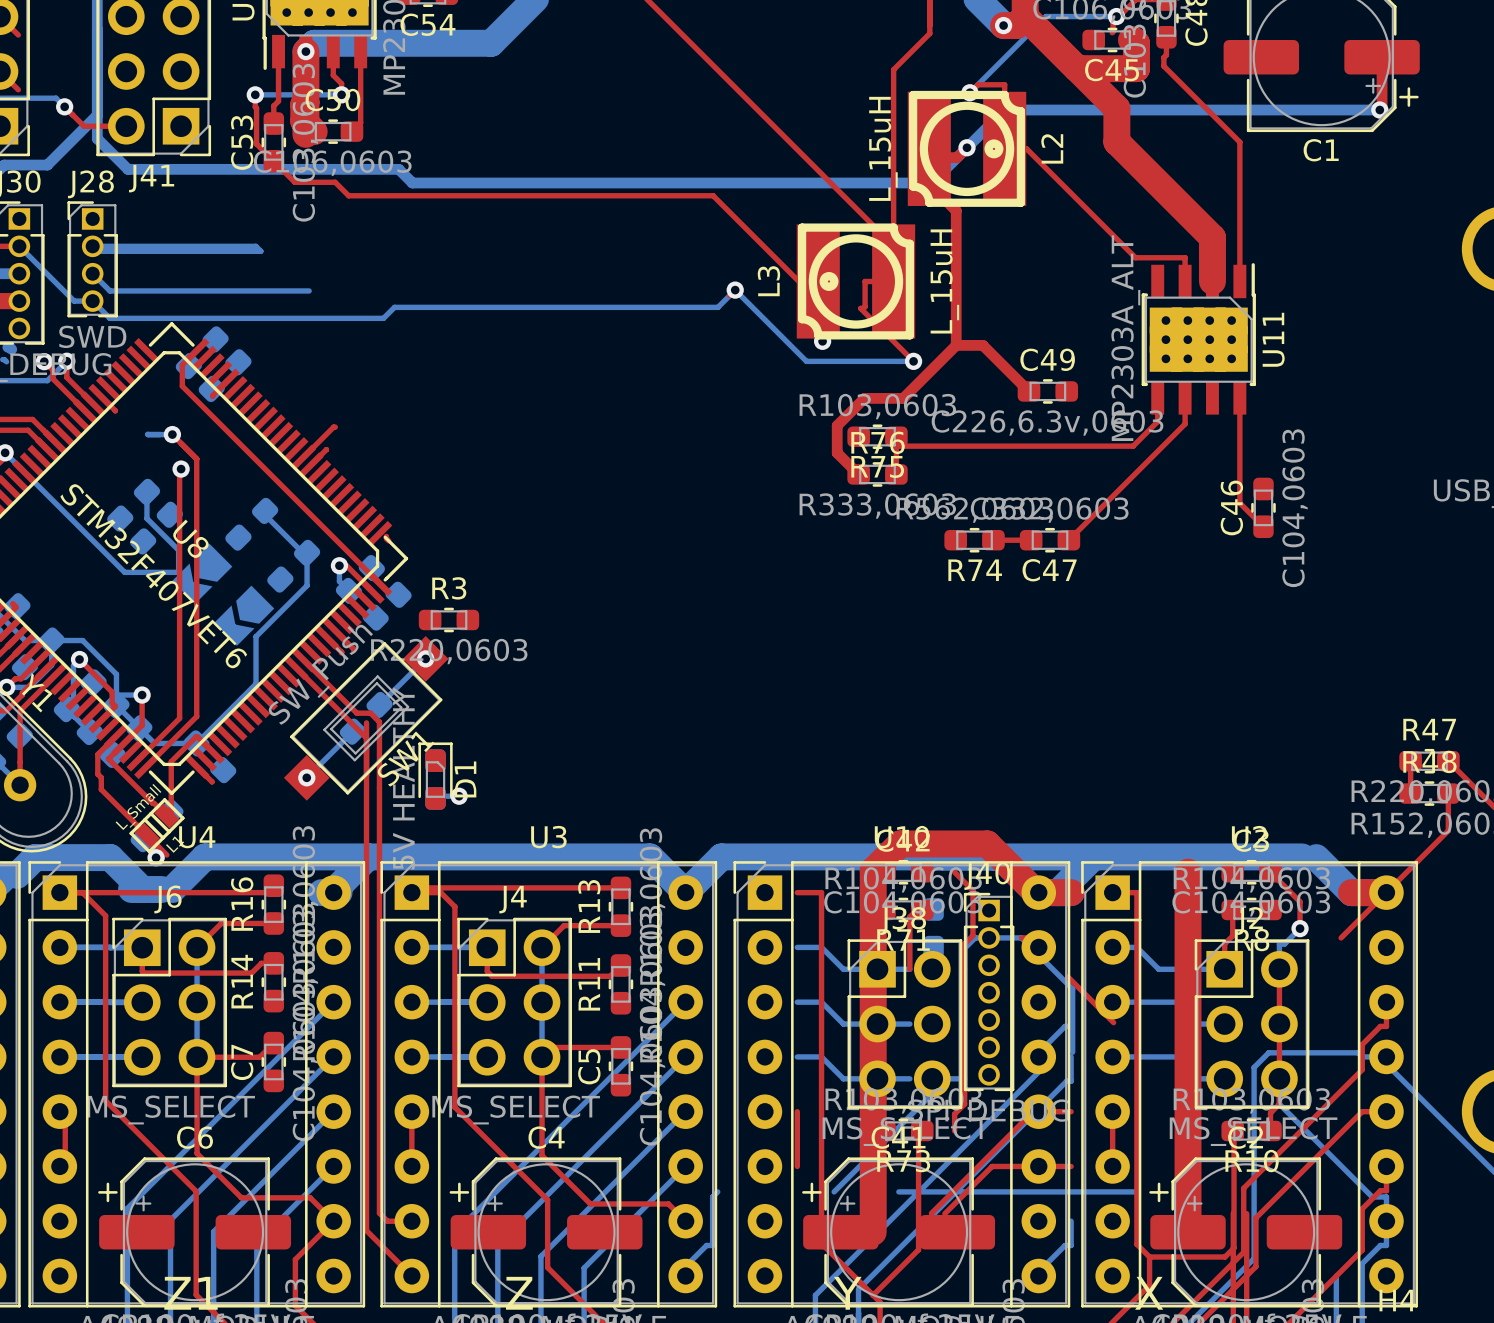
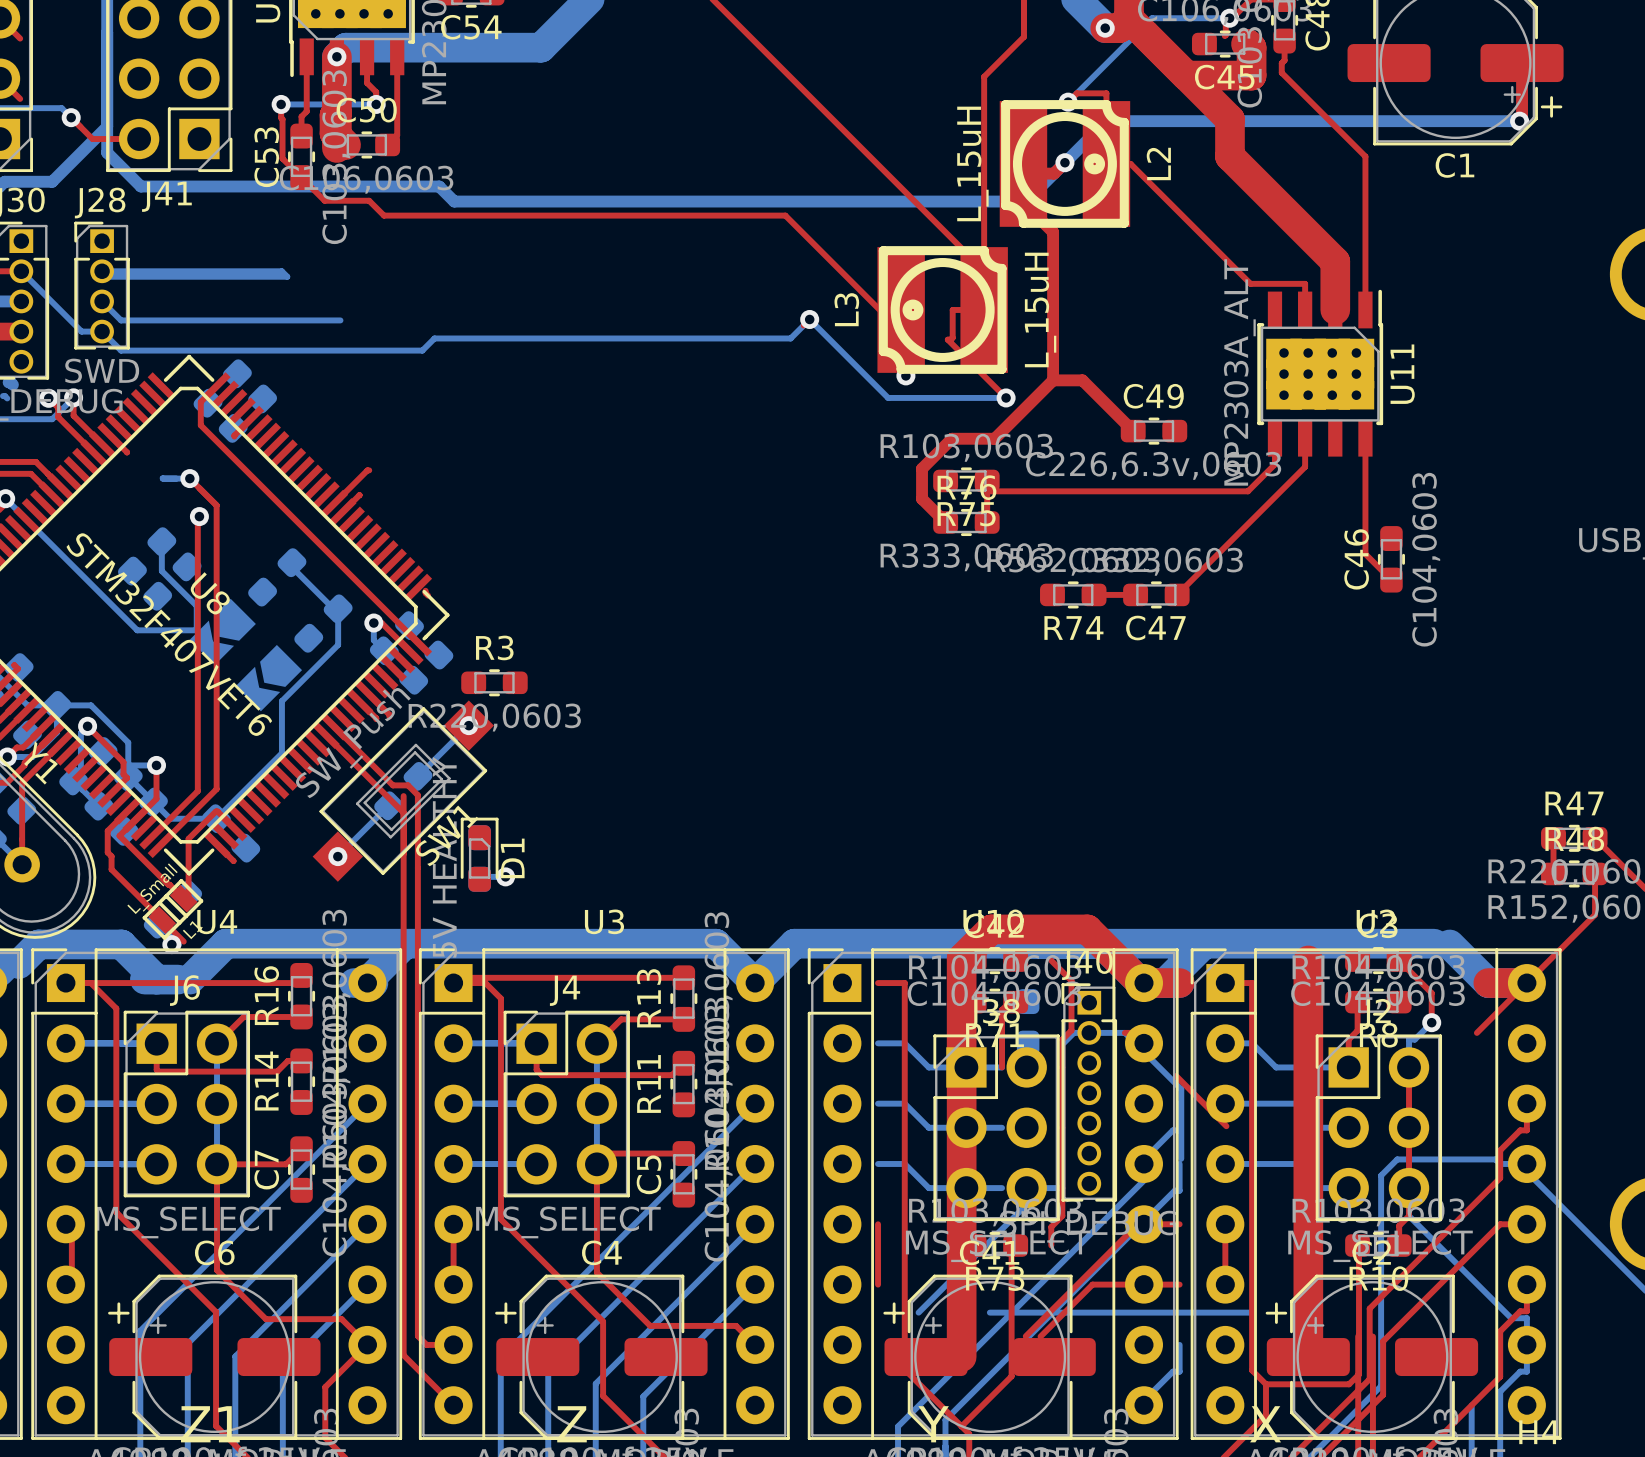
bottom track: (717, 1191) (712, 1196) (712, 1245) (706, 1245) (681, 1270) -> none

